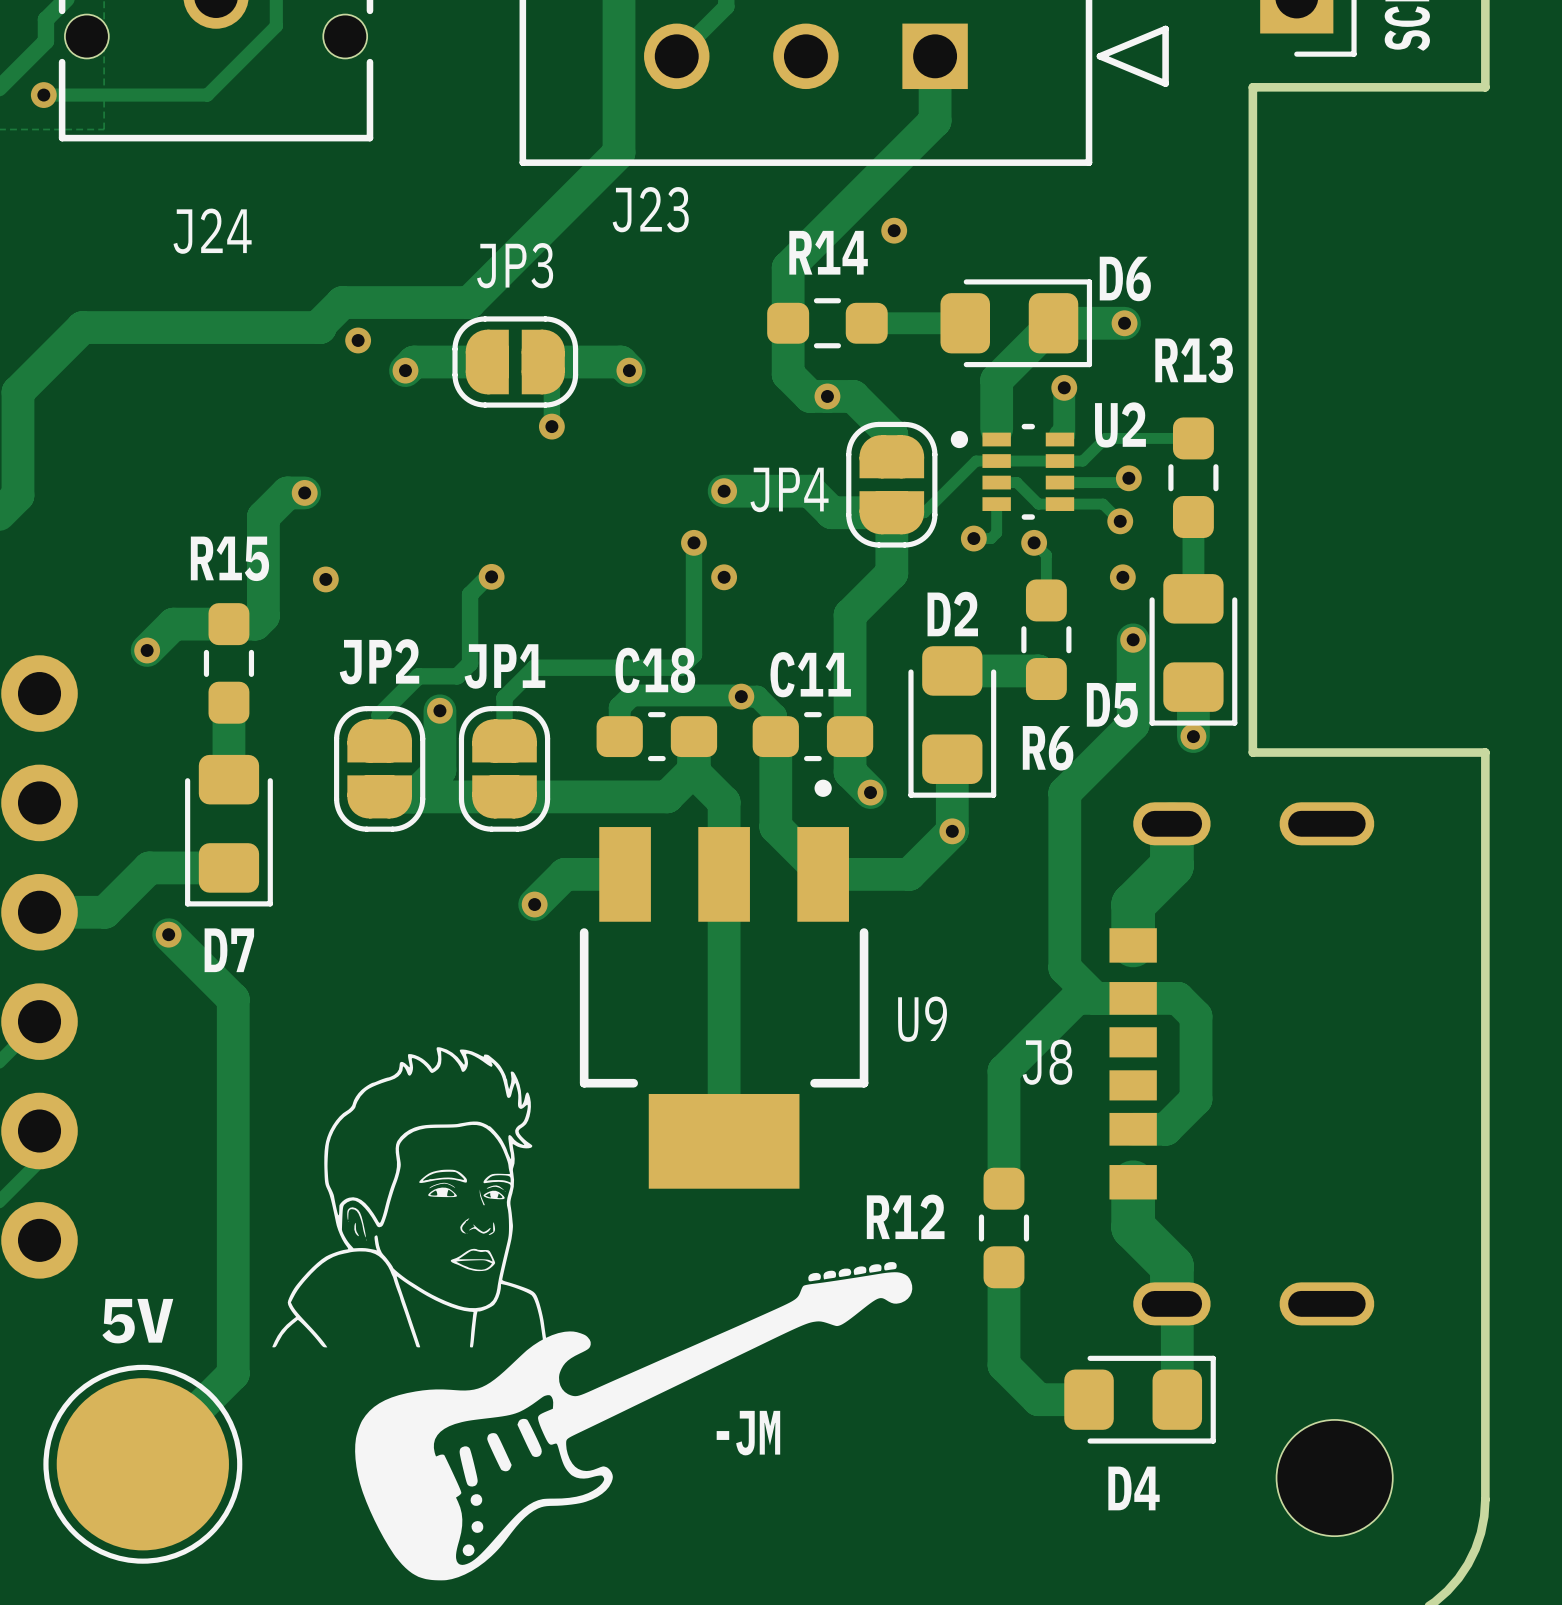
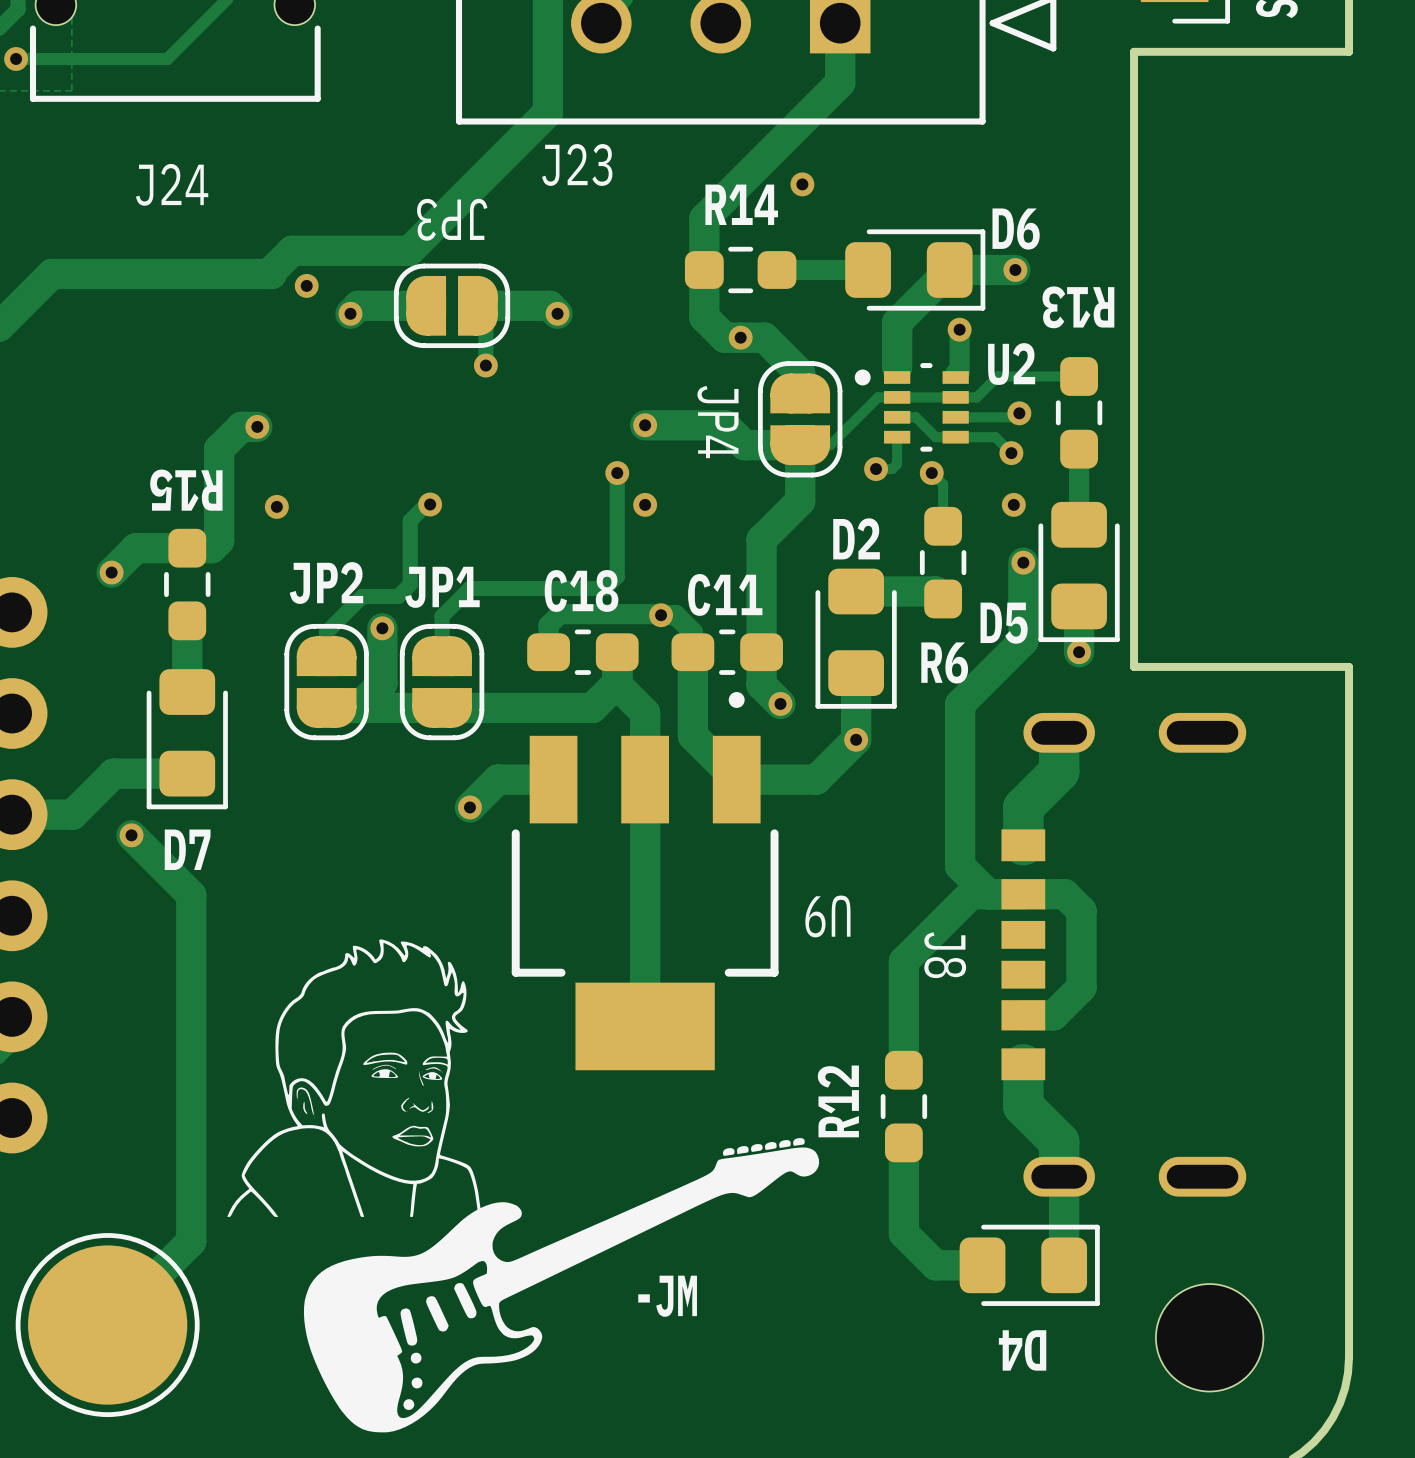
JP3 name rotation: 0° (515, 265) -> 180° (452, 219)
R13 name rotation: 0° (1194, 360) -> 180° (1078, 307)
JP4 name rotation: 0° (789, 489) -> 90° clockwise (717, 422)
R15 name rotation: 0° (229, 558) -> 180° (186, 490)
U9 name rotation: 0° (922, 1019) -> 180° (827, 916)
J8 name rotation: 0° (1047, 1062) -> 90° clockwise (945, 955)
R12 name rotation: 0° (905, 1216) -> 90° counterclockwise (838, 1101)
text: 5V (137, 1321) -> none
D4 name rotation: 0° (1134, 1488) -> 180° (1022, 1350)

